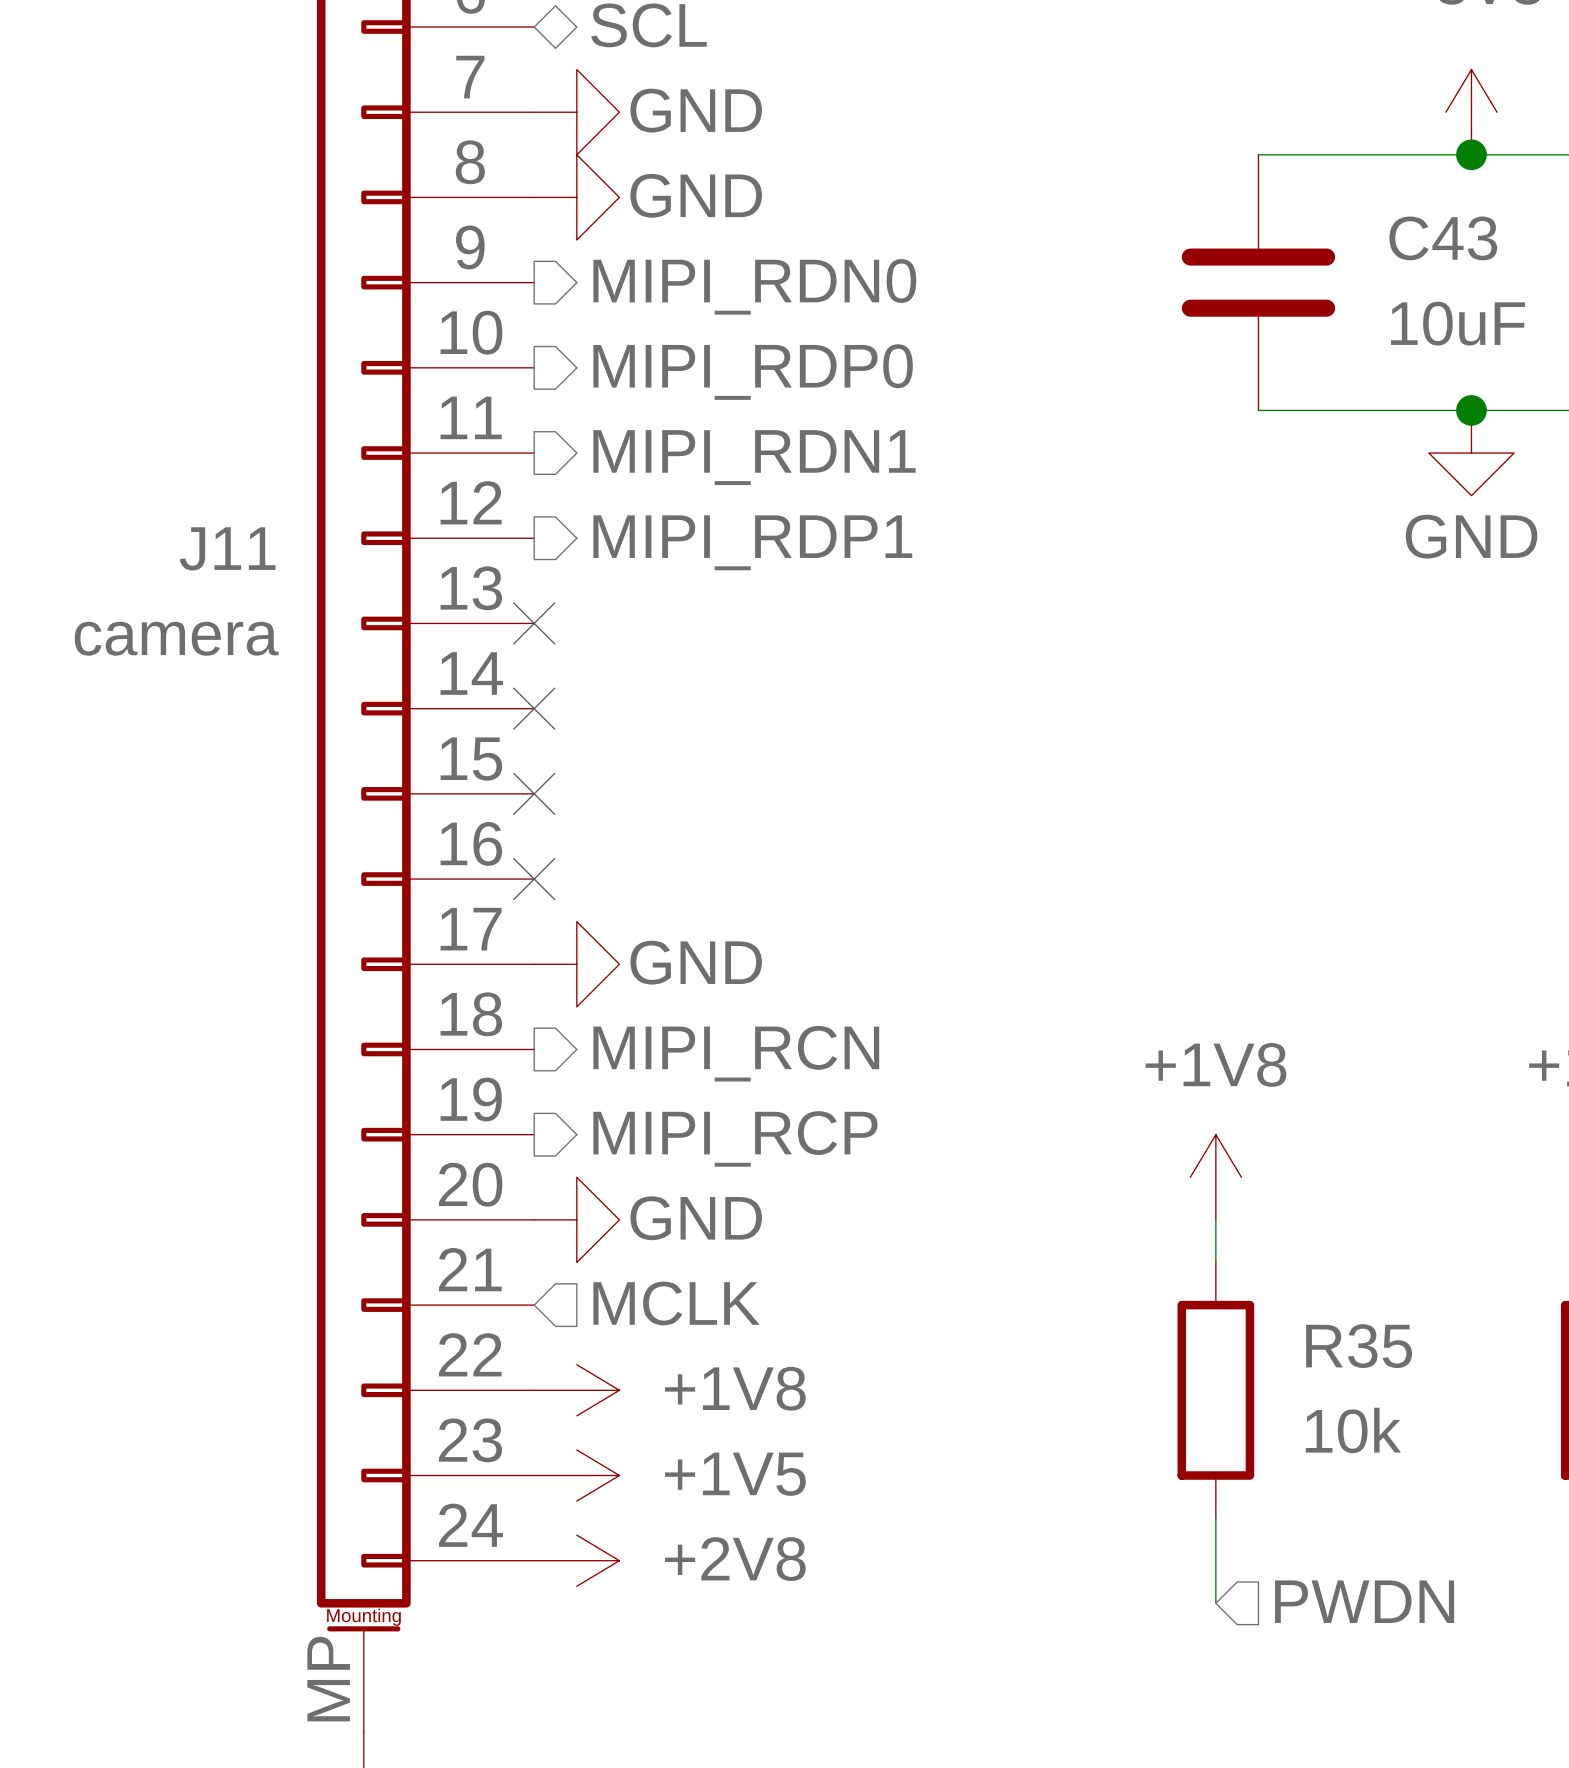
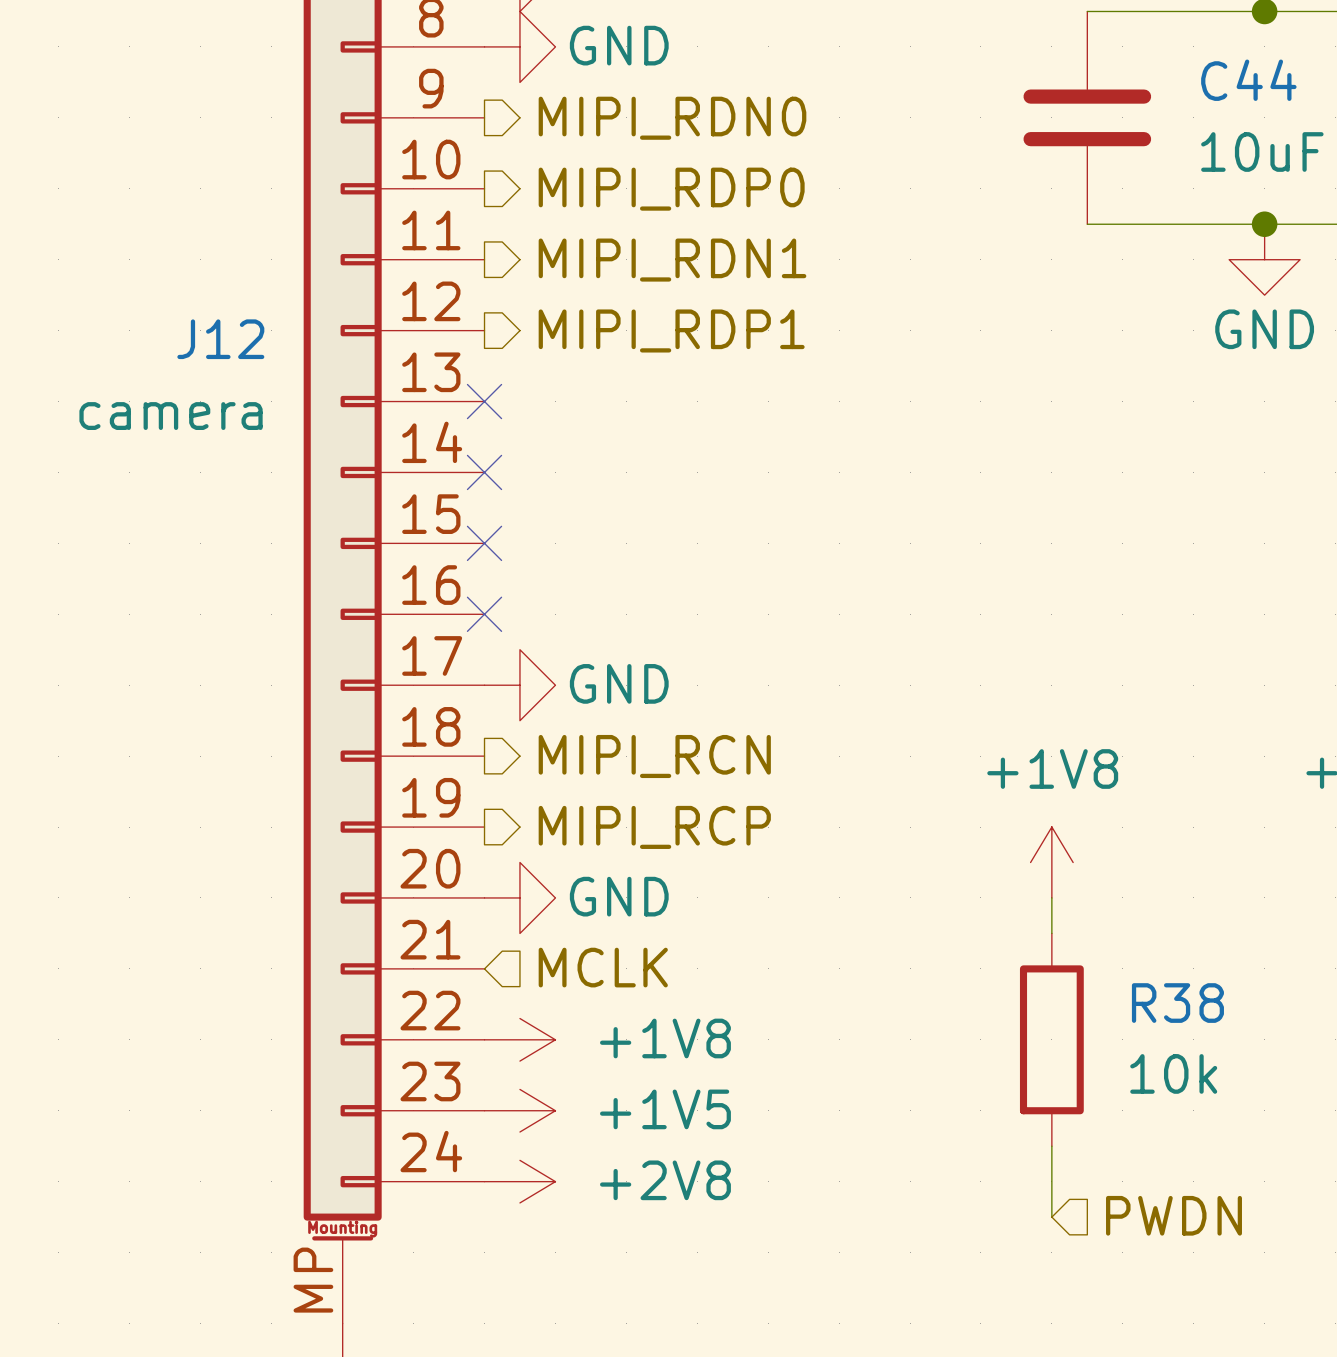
C43 name: C43 (1443, 238) -> C44 (1248, 80)
J11 name: J11 (227, 548) -> J12 (220, 339)
R35 name: R35 (1359, 1346) -> R38 (1177, 1003)

